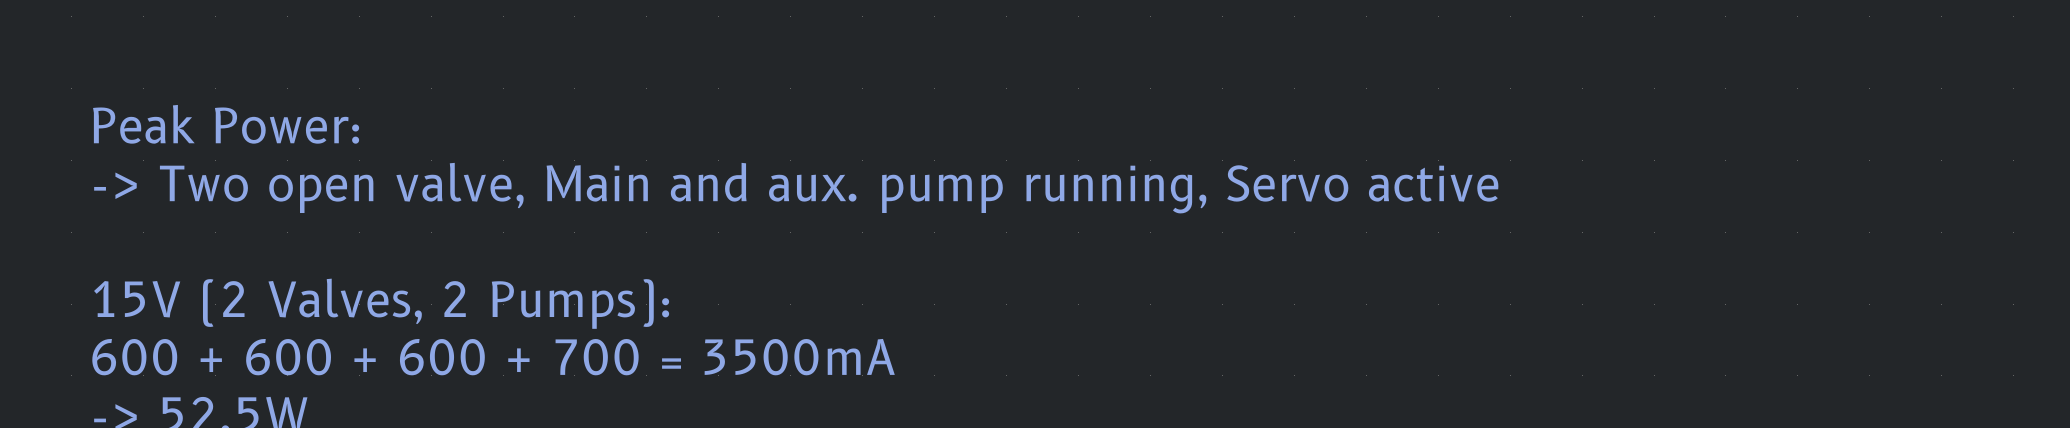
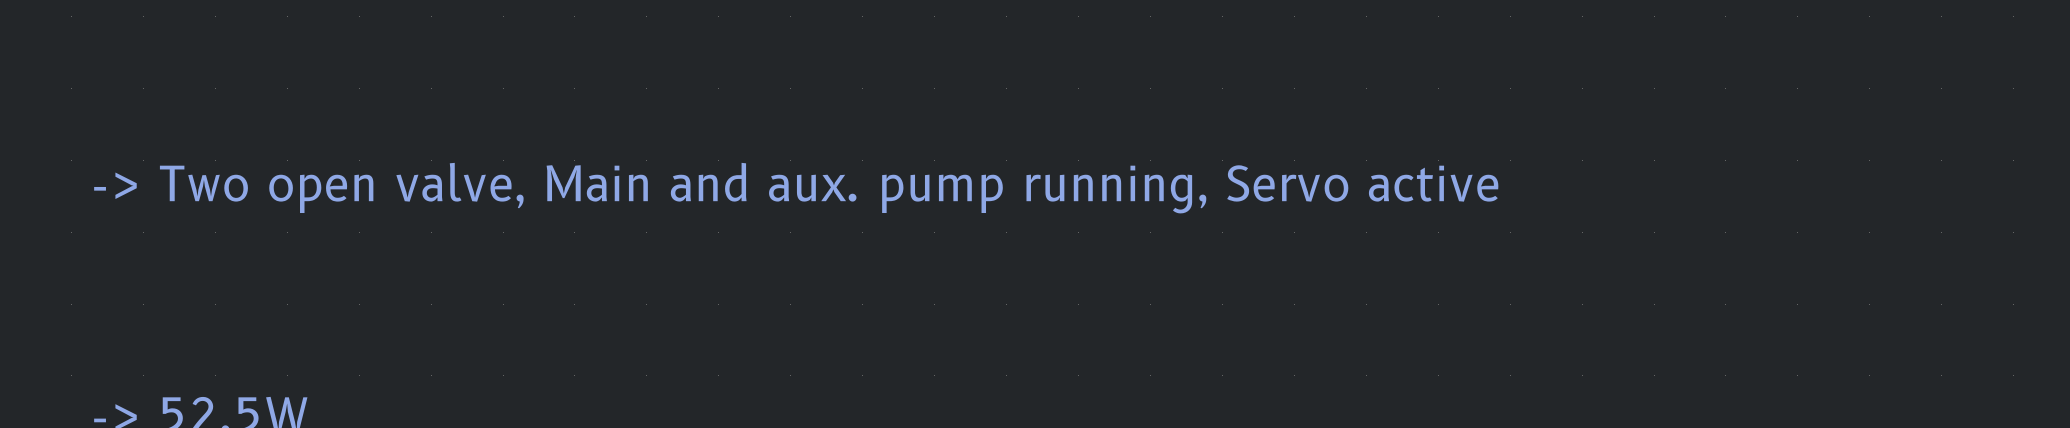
text: Peak Power: (226, 124) -> none
text: 15V (2 Valves, 2 Pumps): (381, 303) -> none
text: 600 + 600 + 600 + 700 = 3500mA (493, 357) -> none

